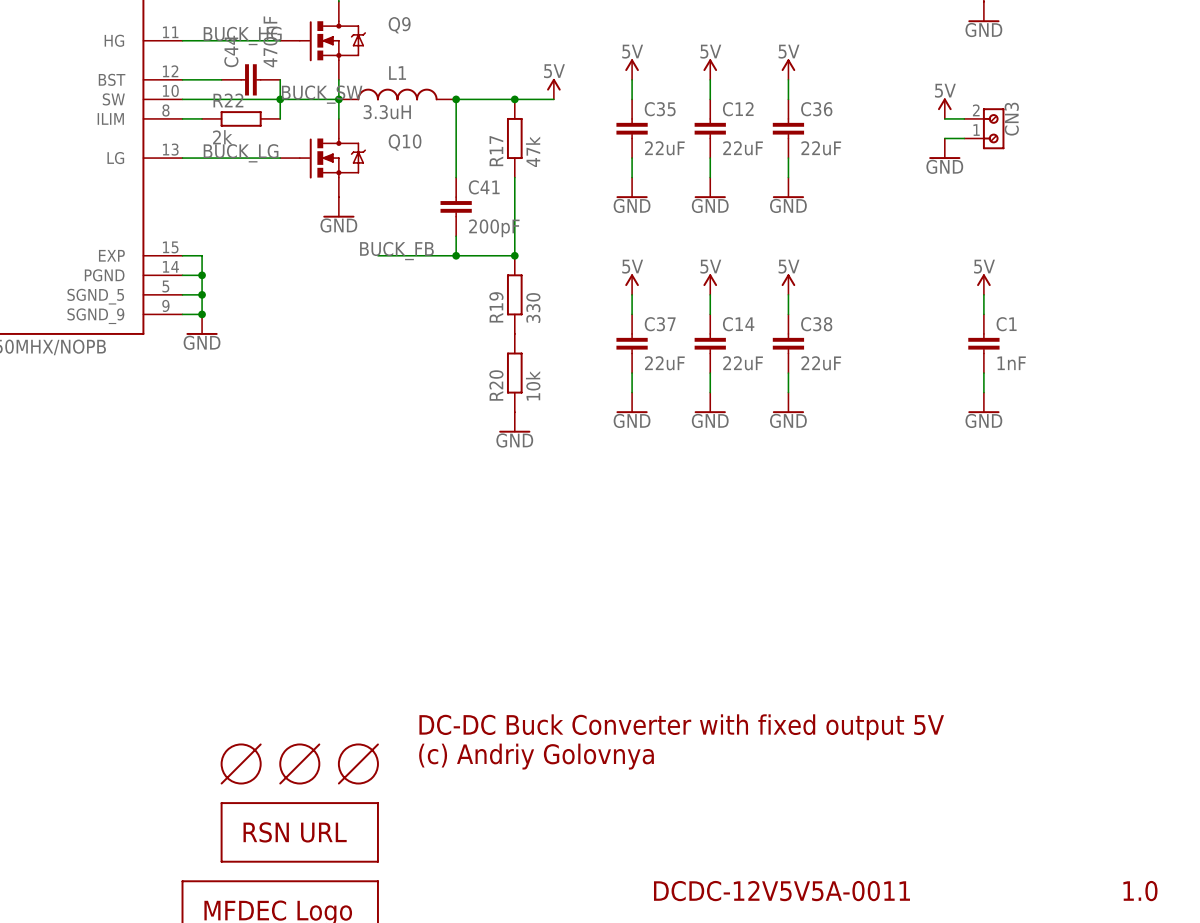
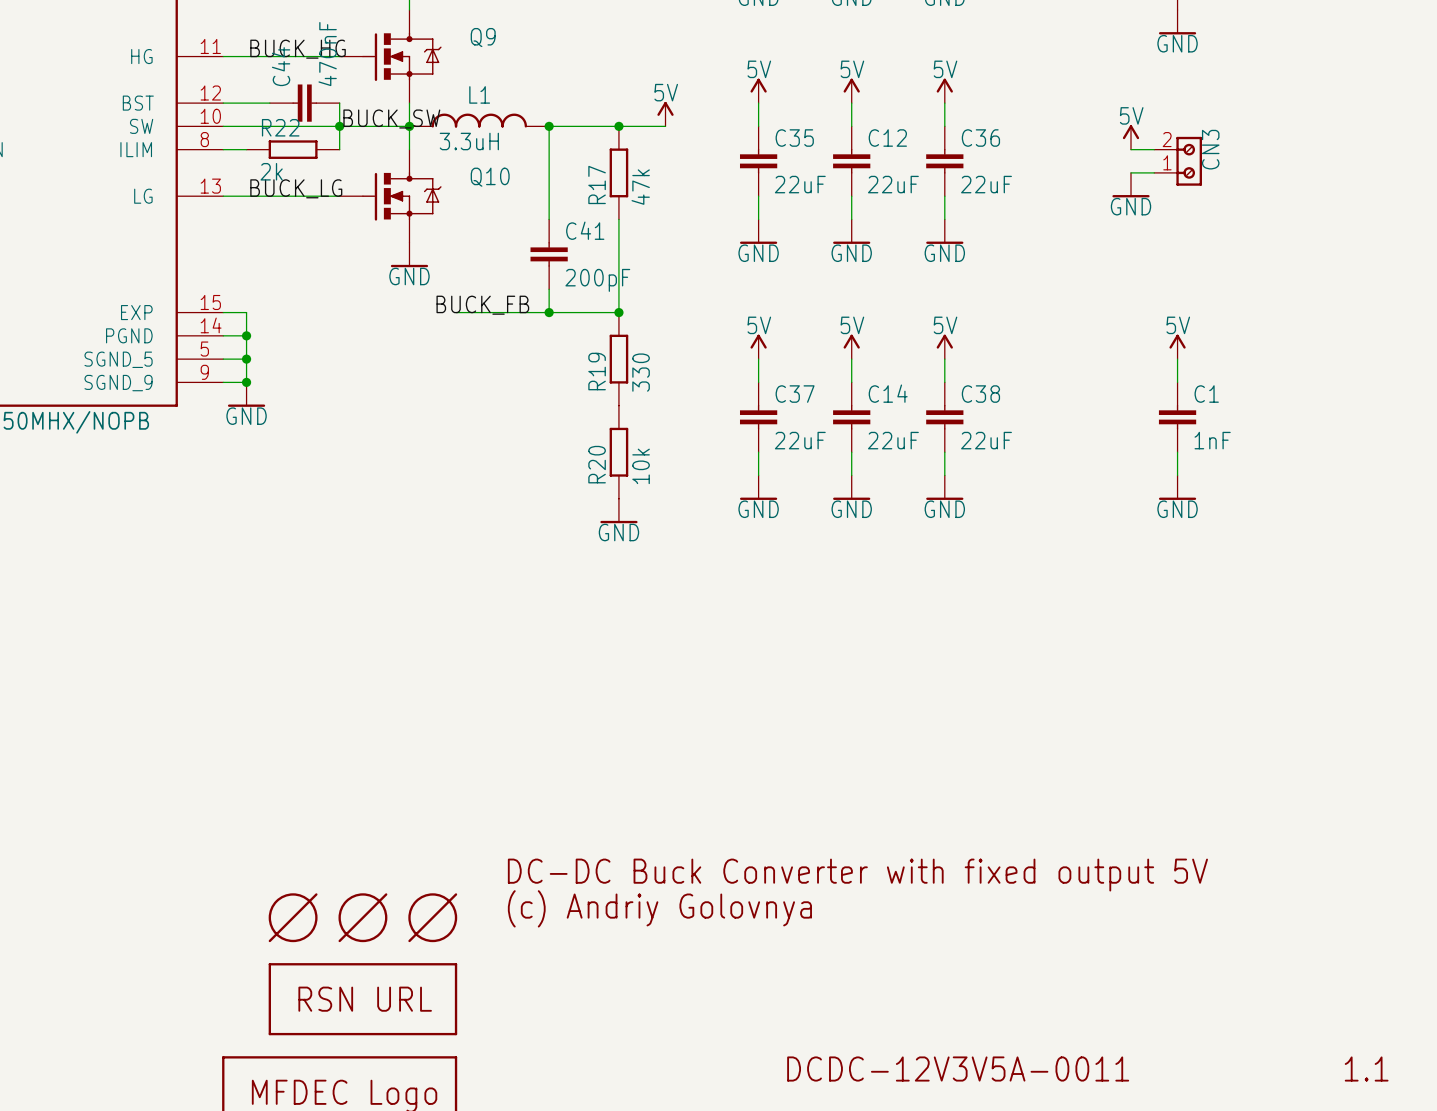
text: DCDC-12V5V5A-0011 (781, 891) -> DCDC-12V3V5A-0011 (958, 1069)
text: 1.0 (1140, 891) -> 1.1 (1366, 1069)

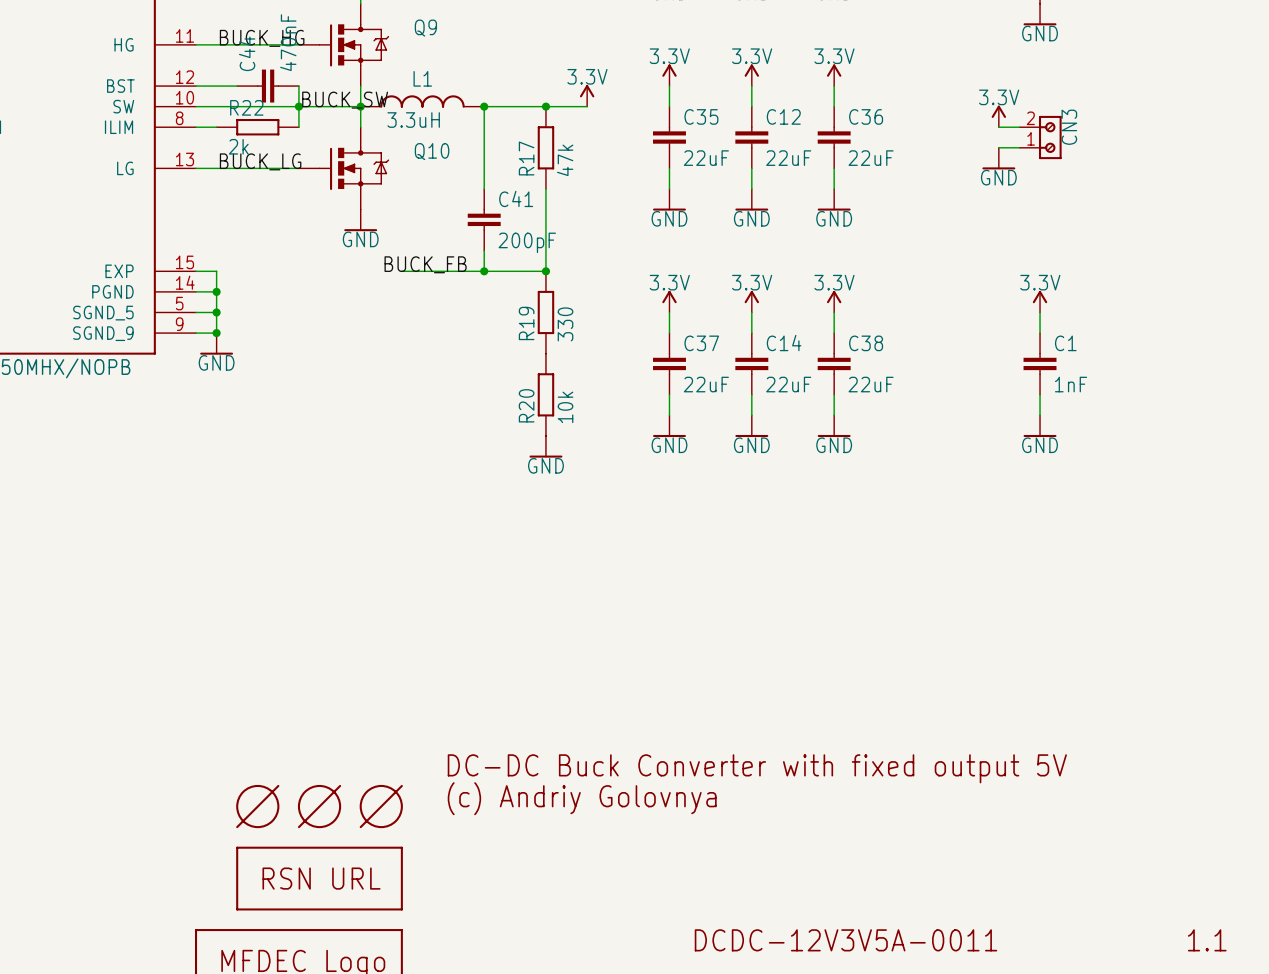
power symbol: 5V (758, 90) -> 3.3V (669, 75)
power symbol: 5V (851, 90) -> 3.3V (751, 75)
power symbol: 5V (944, 90) -> 3.3V (834, 75)
power symbol: 5V (665, 114) -> 3.3V (587, 95)
power symbol: 5V (1131, 137) -> 3.3V (998, 116)
power symbol: 5V (758, 346) -> 3.3V (669, 301)
power symbol: 5V (851, 346) -> 3.3V (751, 301)
power symbol: 5V (944, 346) -> 3.3V (834, 301)
power symbol: 5V (1177, 346) -> 3.3V (1040, 301)

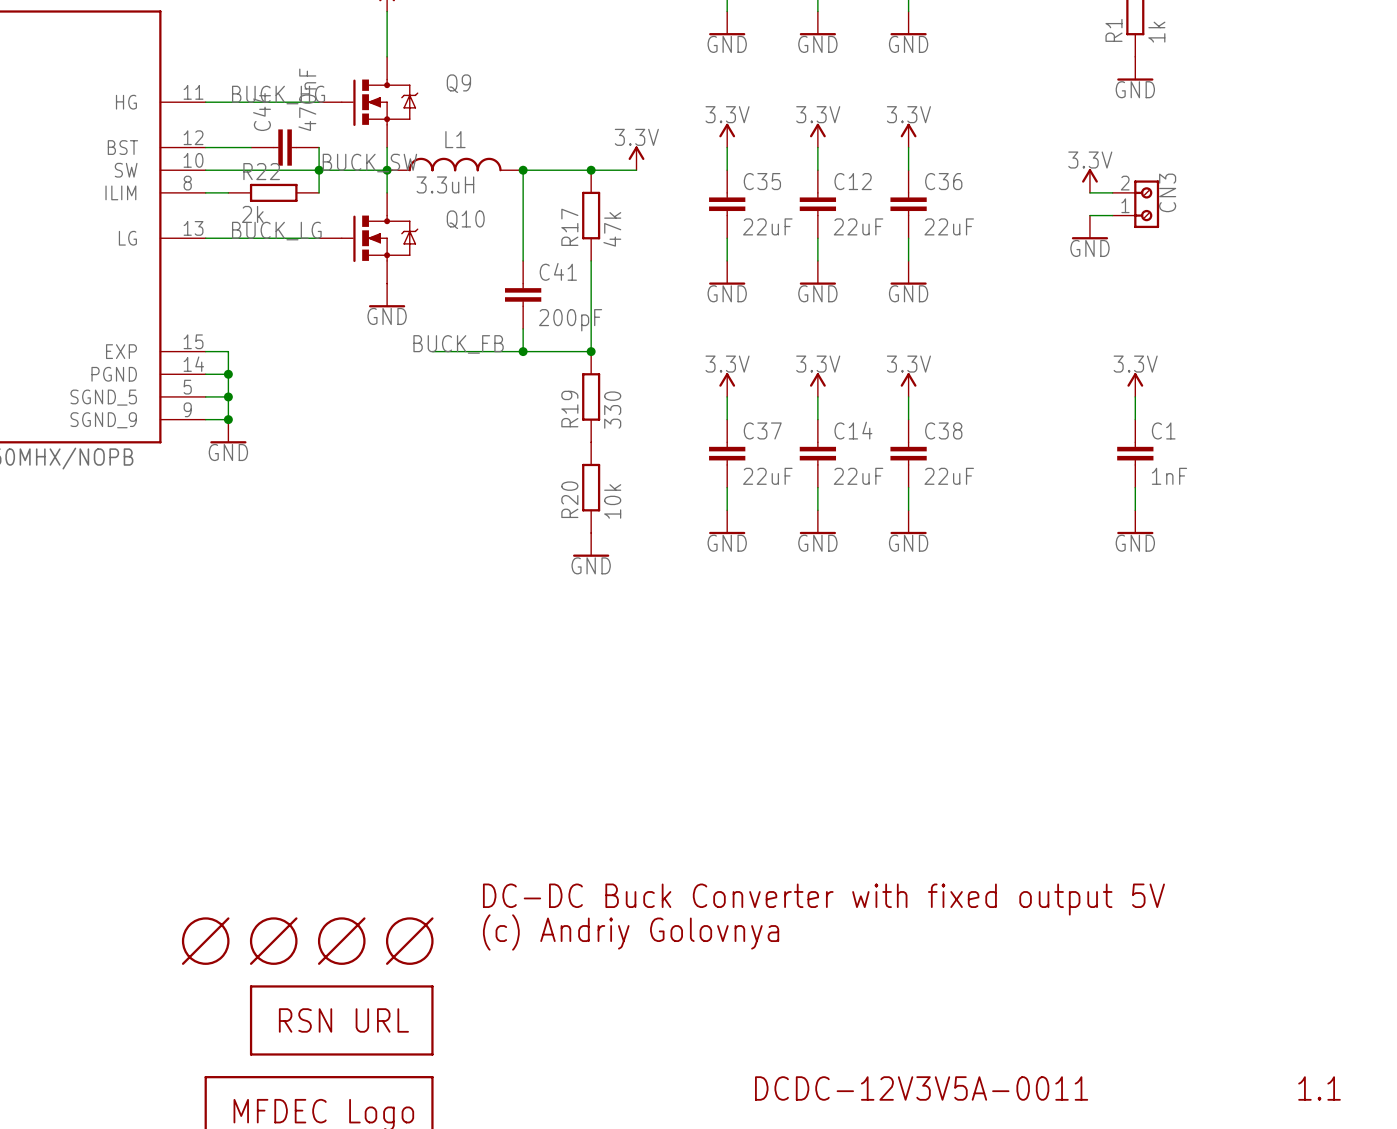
part: none -> (205, 941)

